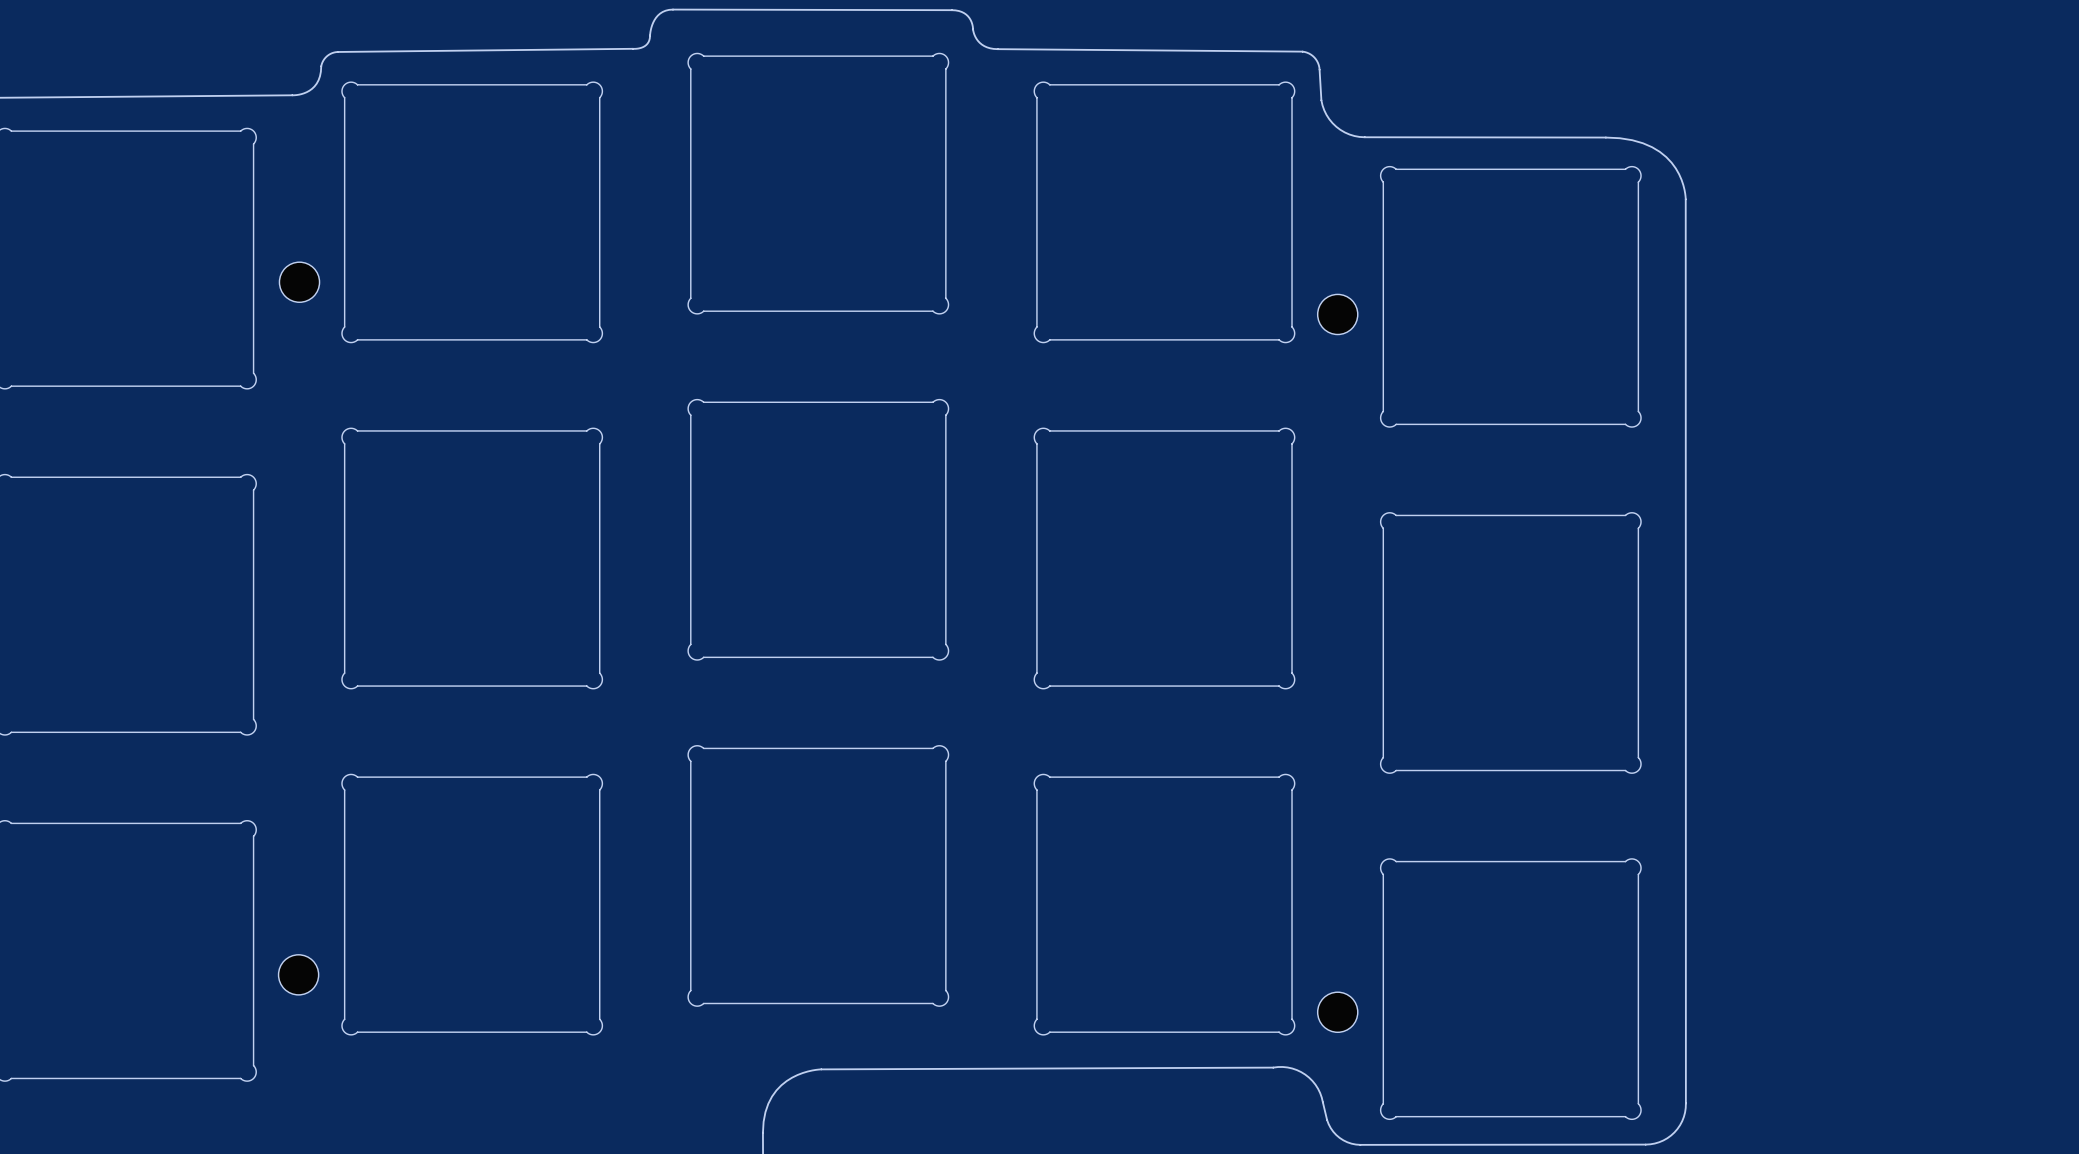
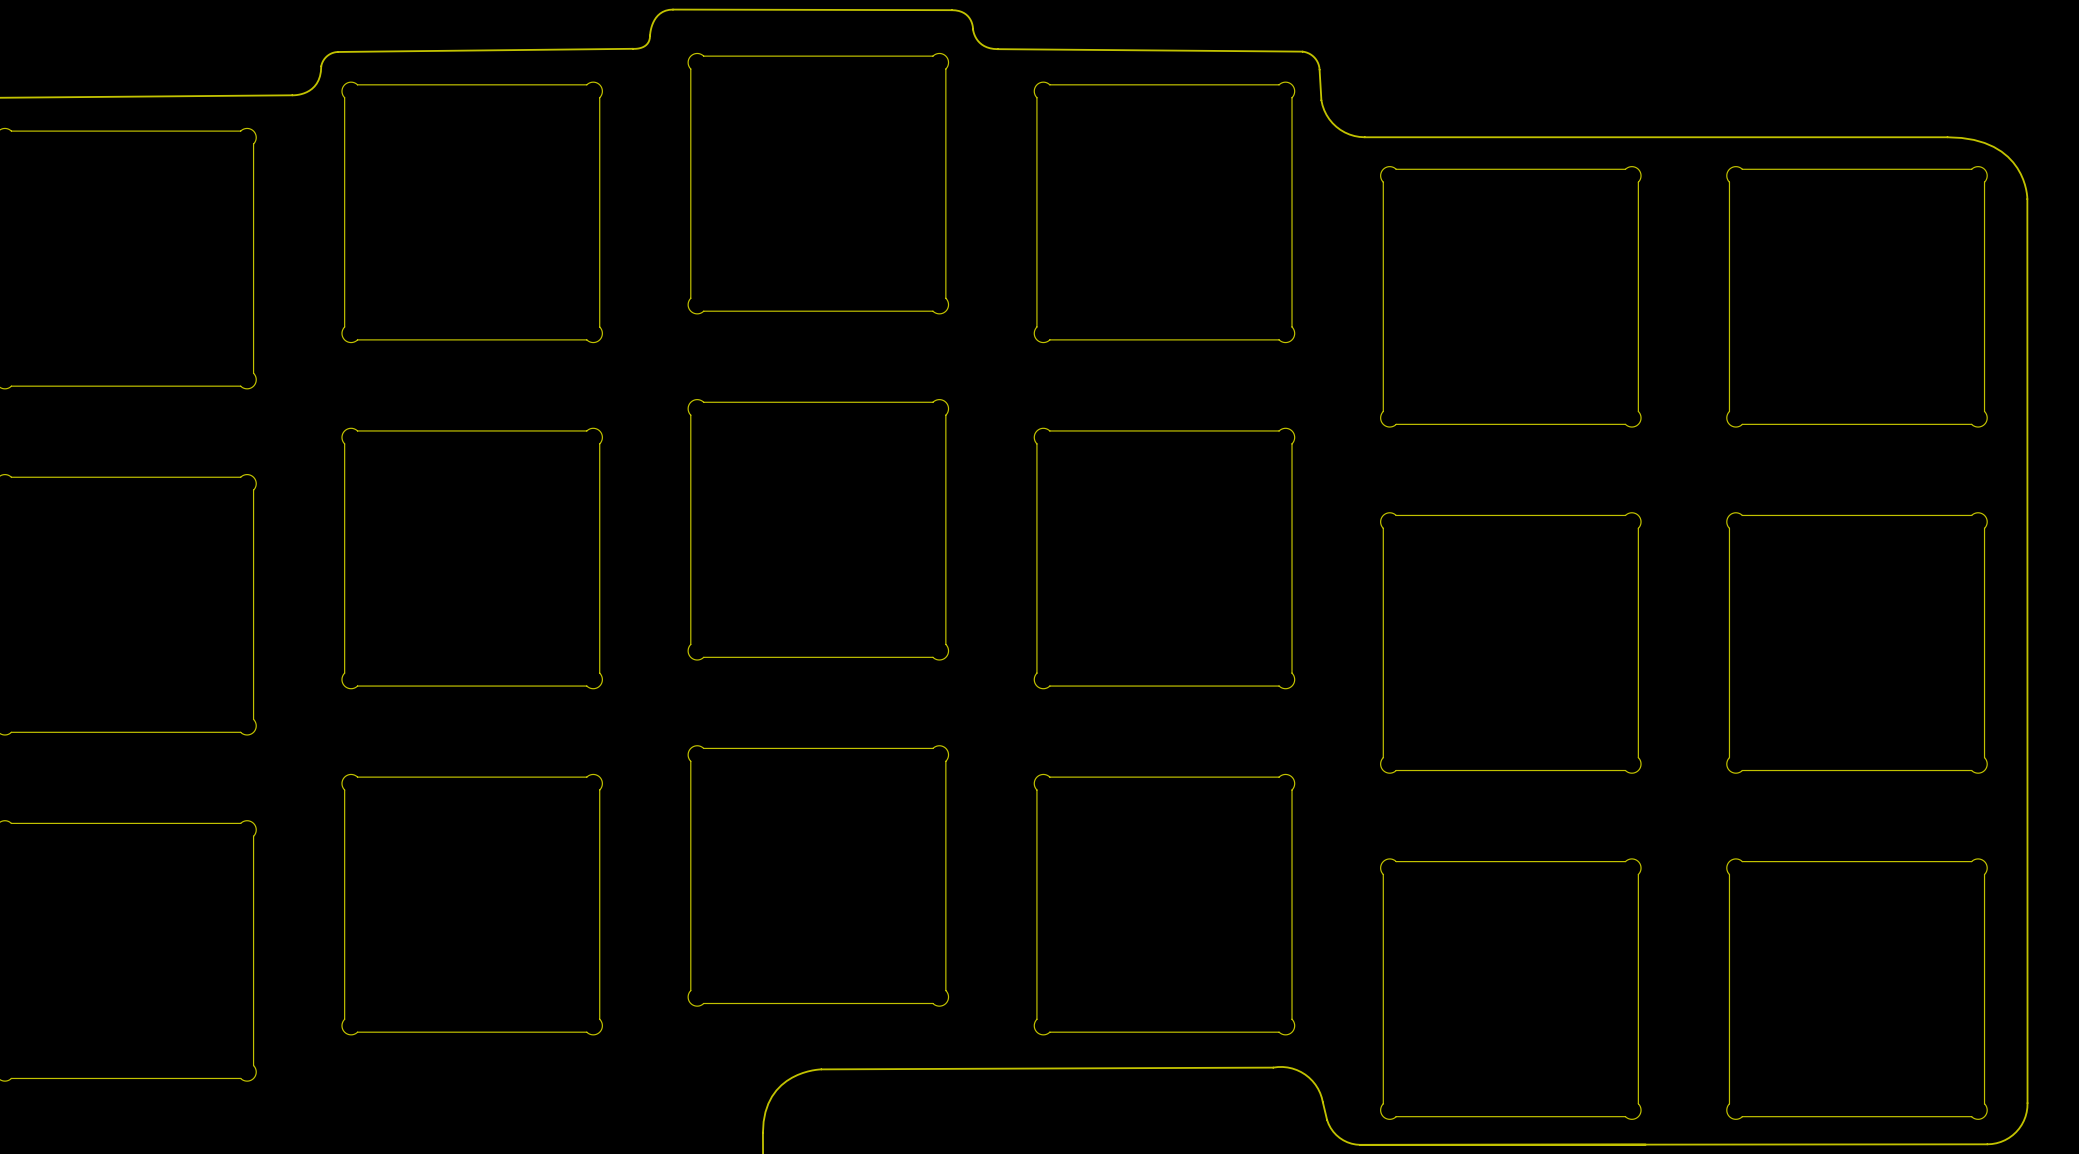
board edge: (1364, 137) (1619, 138) (1642, 143) (1659, 151) (1675, 168) (1683, 185) (1685, 199) (1685, 1107) (1682, 1121) (1671, 1135) (1659, 1142) (1645, 1144) -> (1364, 137) (1947, 137) (1973, 139) (1993, 146) (2007, 156) (2017, 168) (2024, 184) (2027, 199) (2027, 1103) (2023, 1120) (2016, 1132) (2005, 1140) (1991, 1144) (1360, 1144)
drawing: none -> [1726, 166, 1988, 428]
part: (299, 282) -> none
part: (1337, 314) -> none
drawing: none -> [1726, 512, 1988, 774]
drawing: none -> [1726, 858, 1988, 1120]
part: (298, 974) -> none
part: (1337, 1012) -> none

